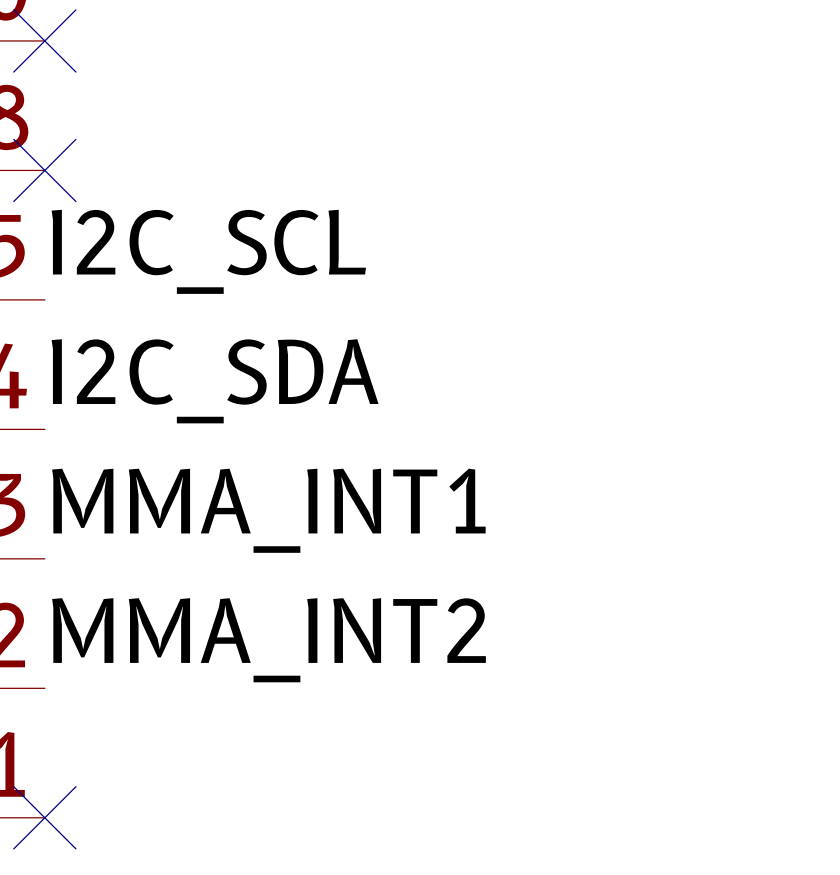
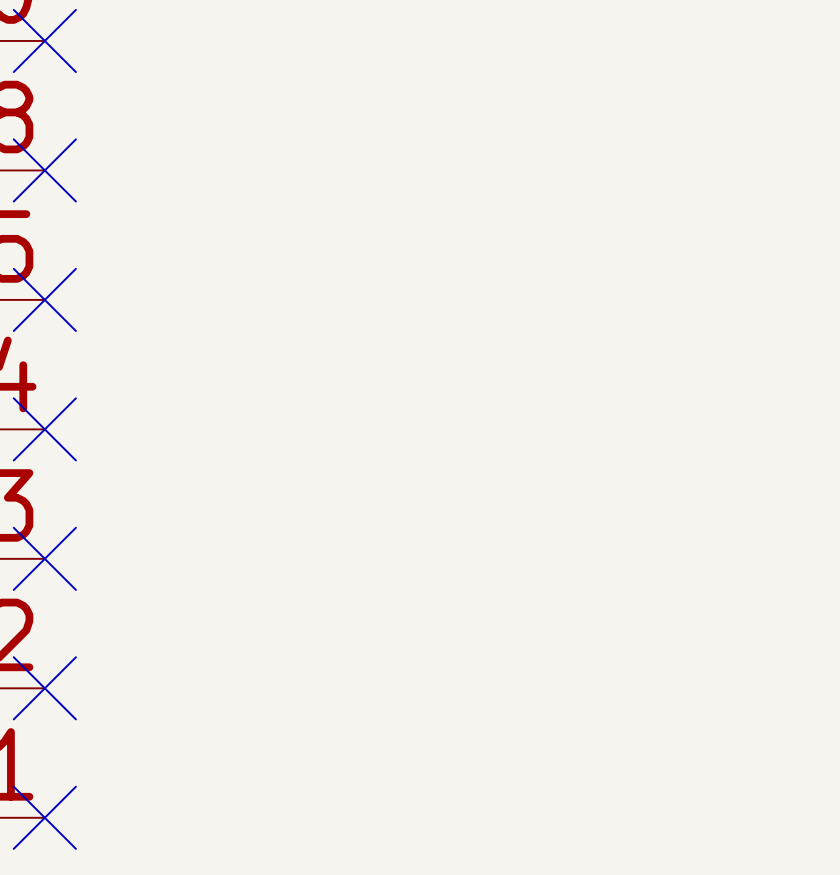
label: I2C_SCL (208, 251) -> none
no-connect mark: none -> (44, 299)
label: I2C_SDA (215, 381) -> none
no-connect mark: none -> (44, 429)
label: MMA_INT1 (268, 510) -> none
no-connect mark: none -> (44, 558)
label: MMA_INT2 (269, 640) -> none
no-connect mark: none -> (44, 688)

